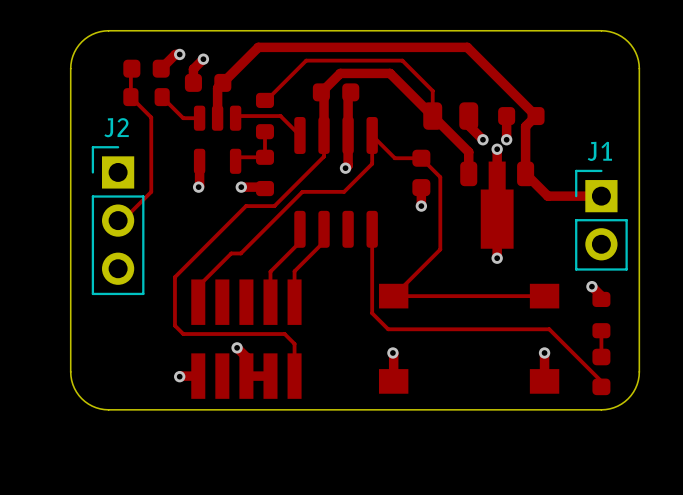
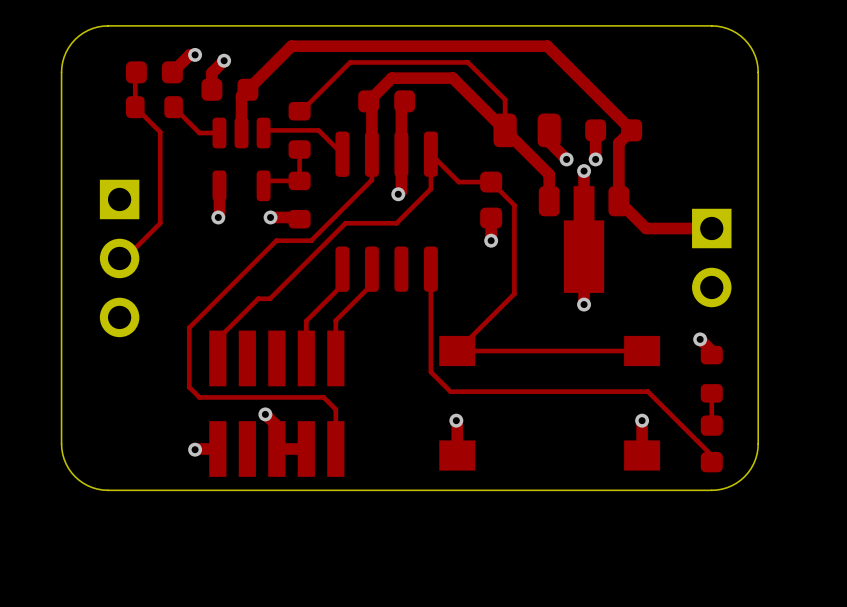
J2 side: bottom (118, 220) -> top (119, 258)
J1 side: bottom (601, 220) -> top (711, 257)

